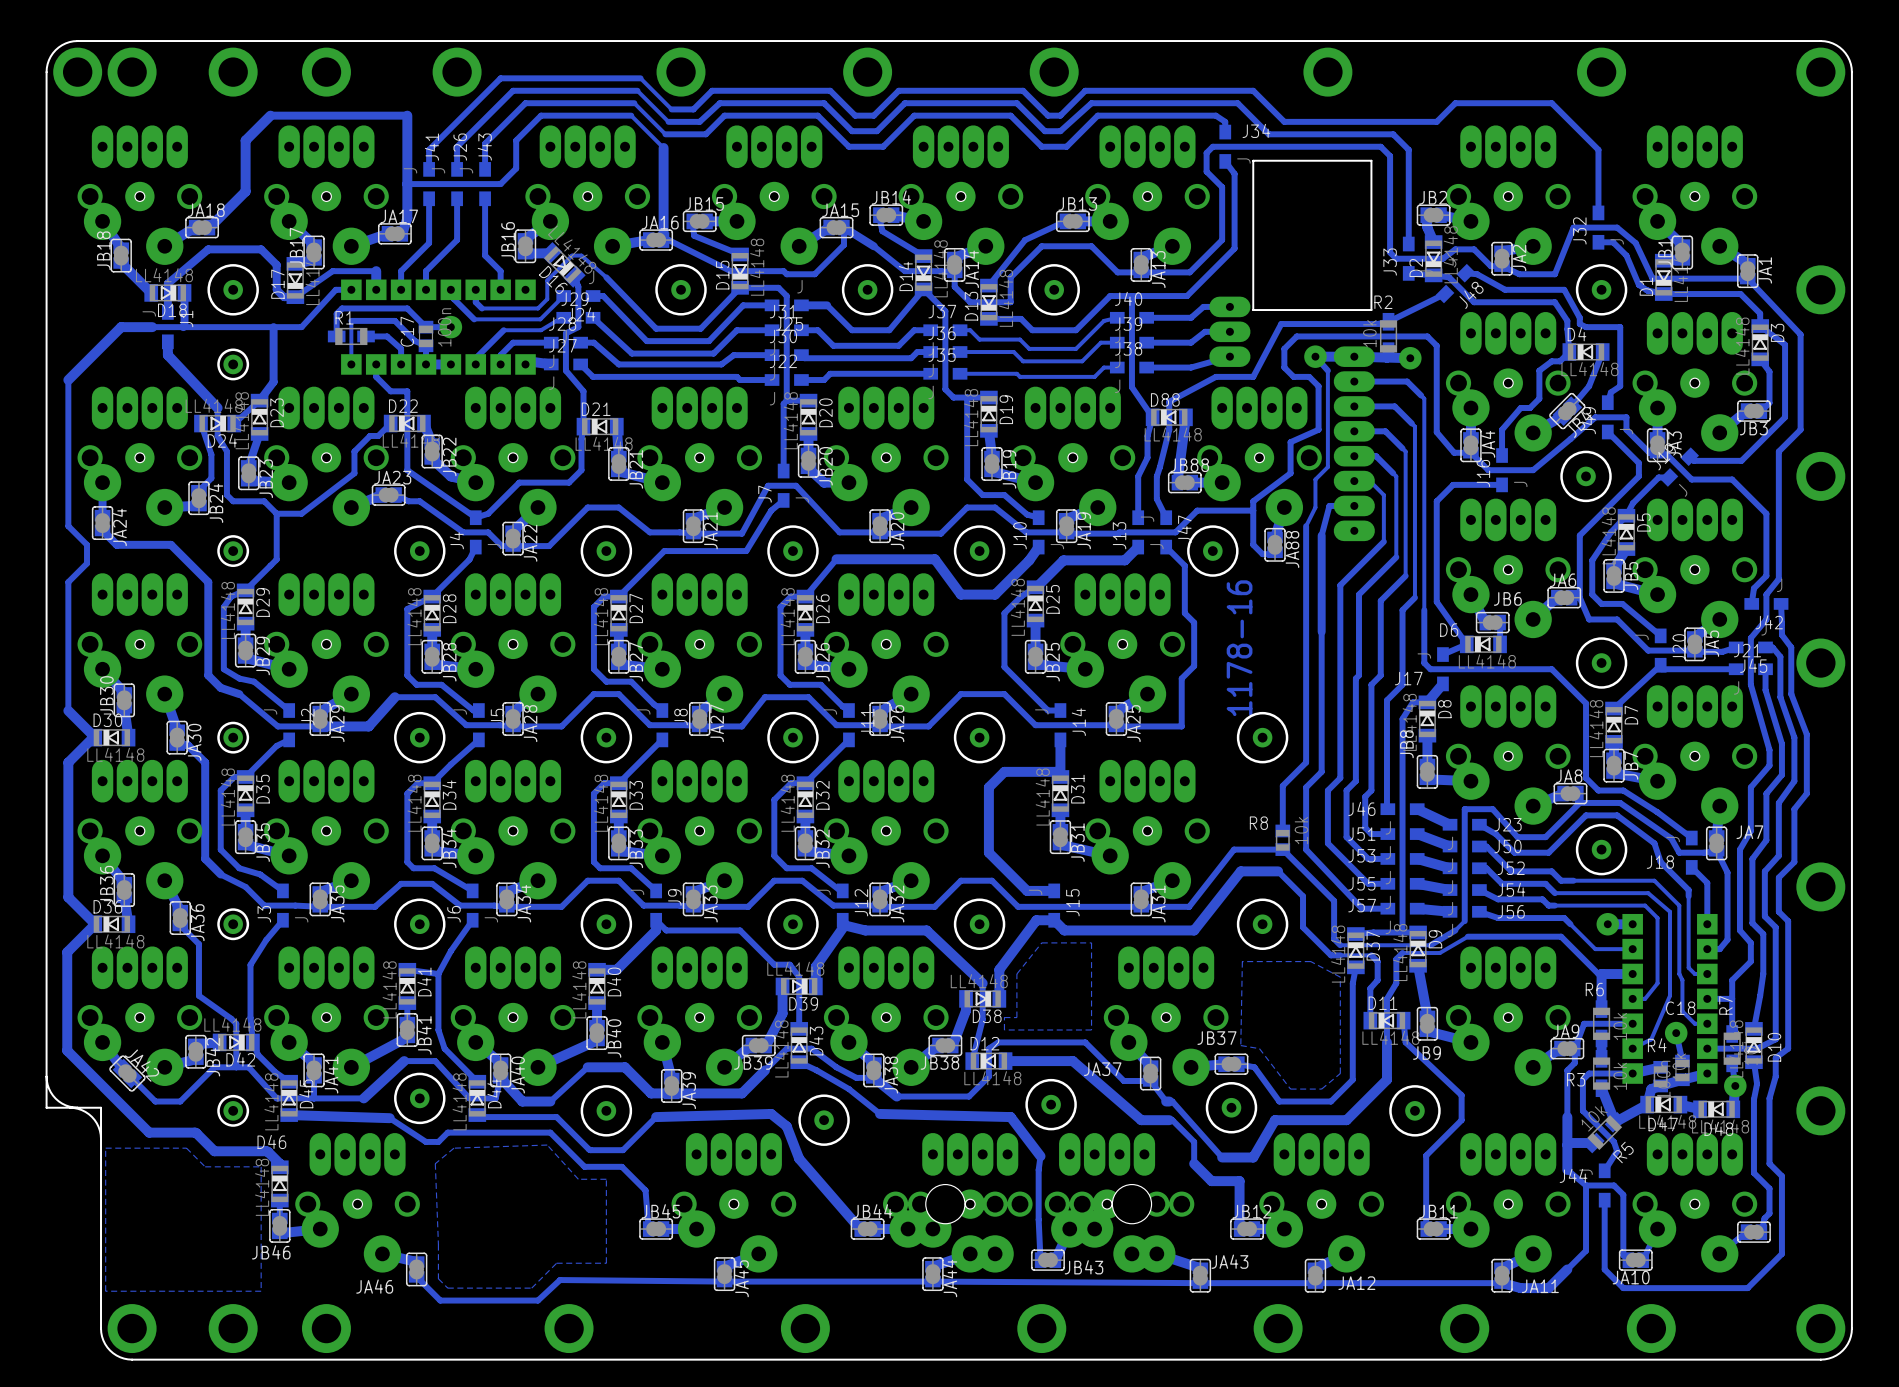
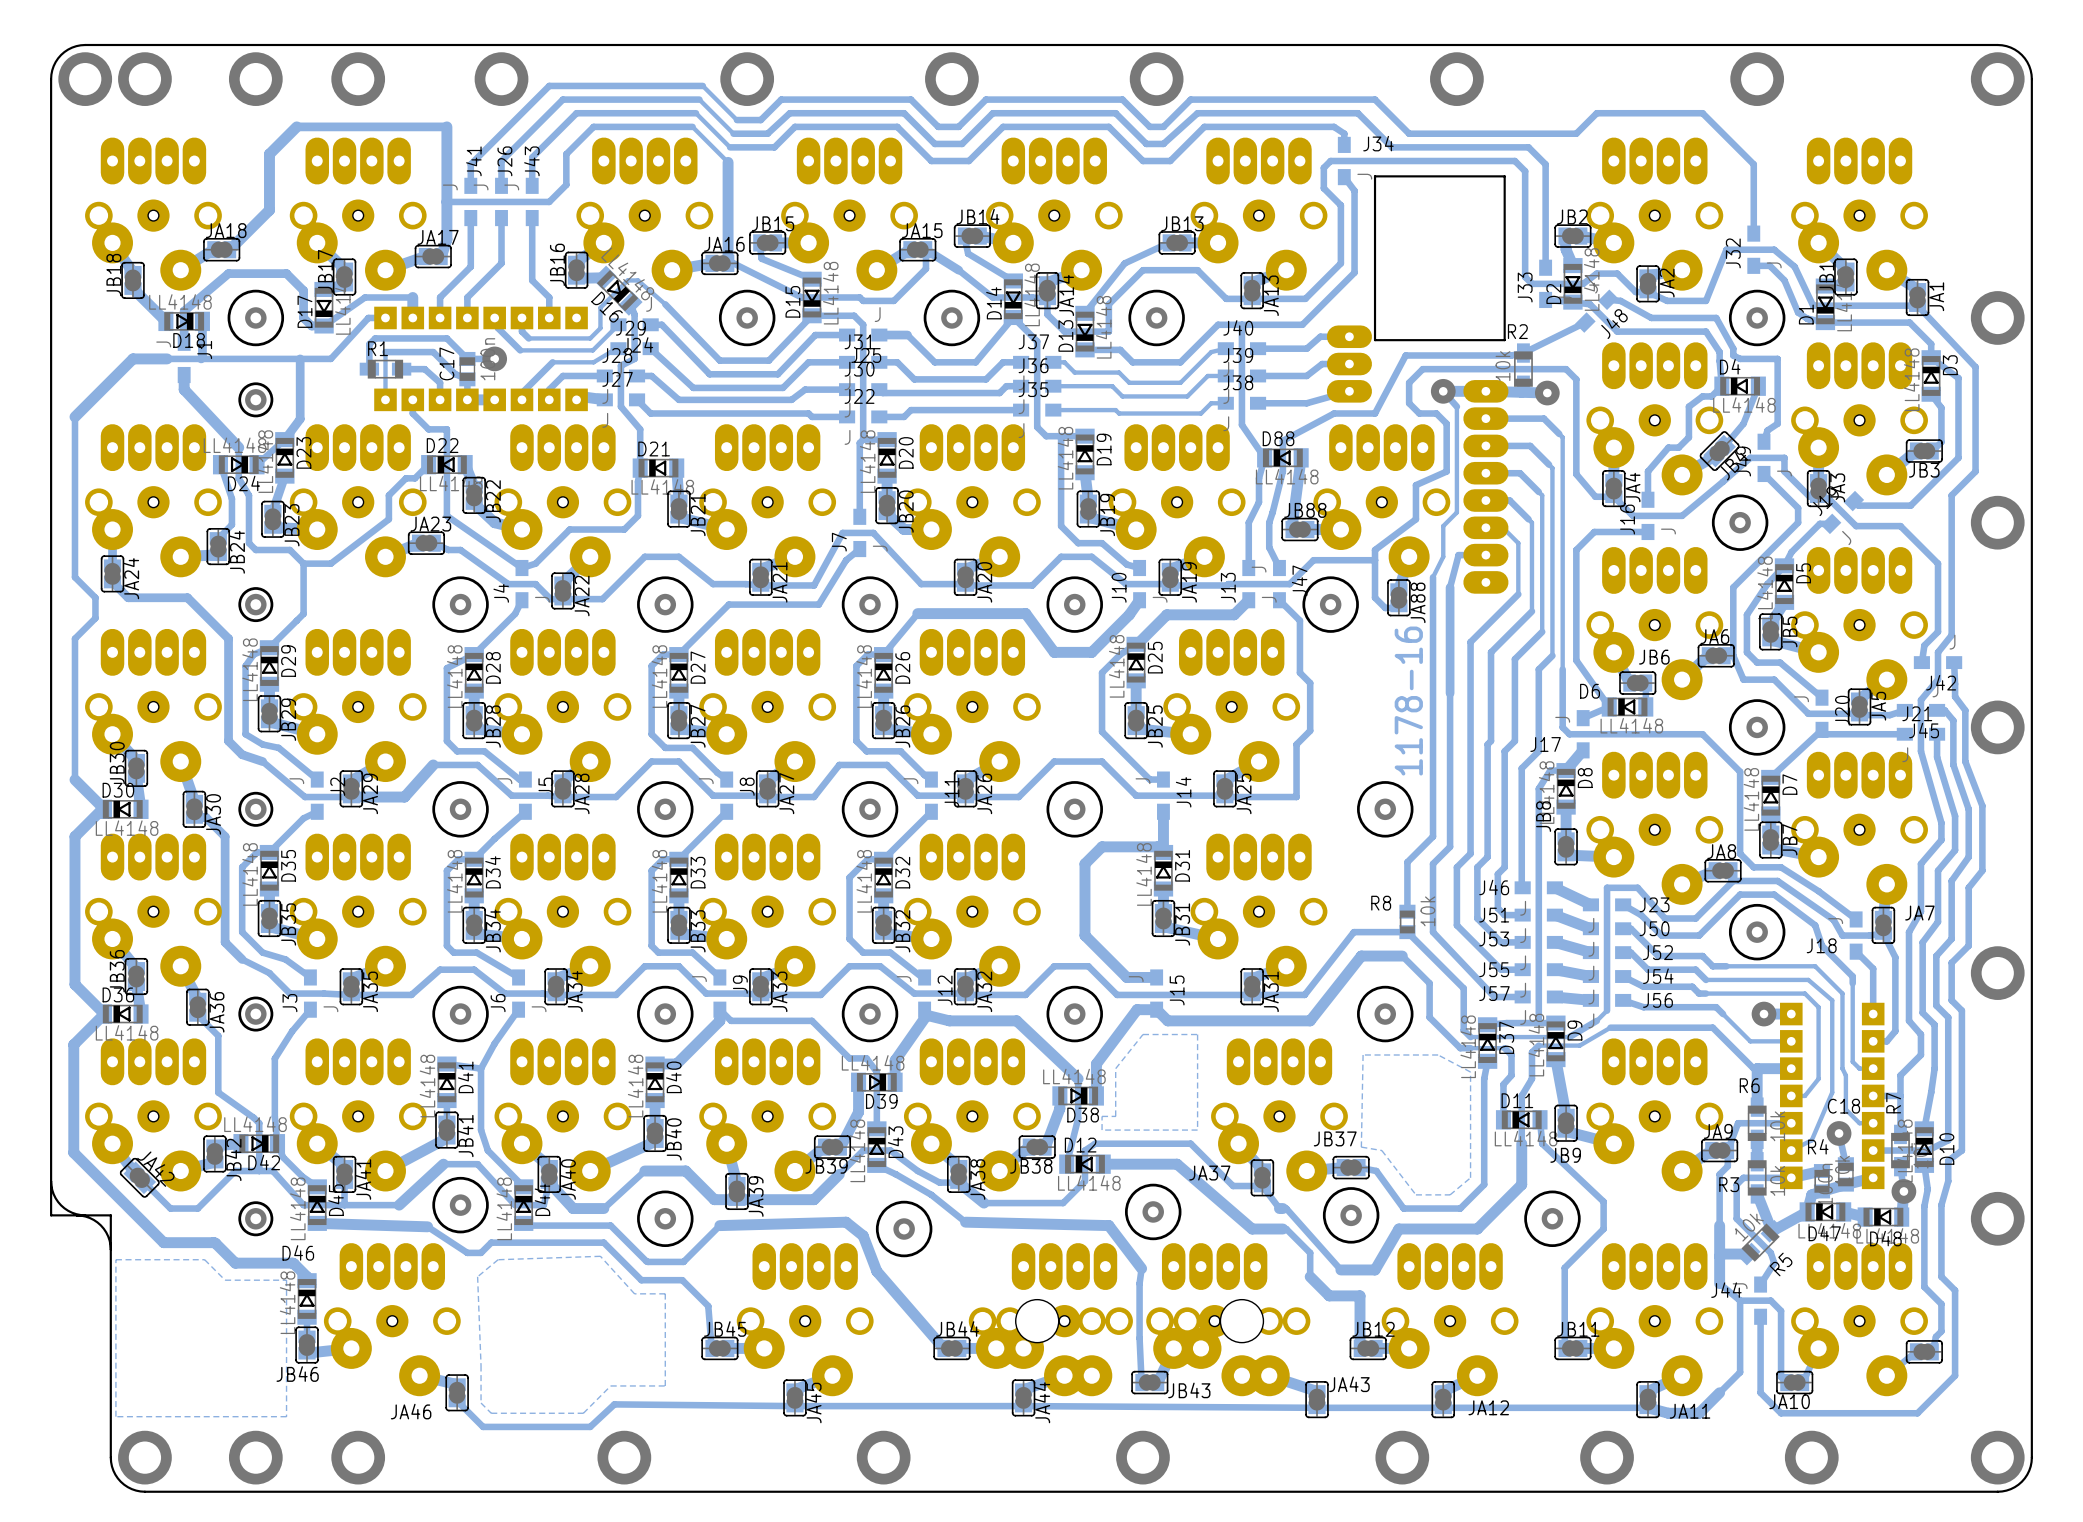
text position: 1178-16 (1239, 648) -> 1178-16 (1408, 701)

